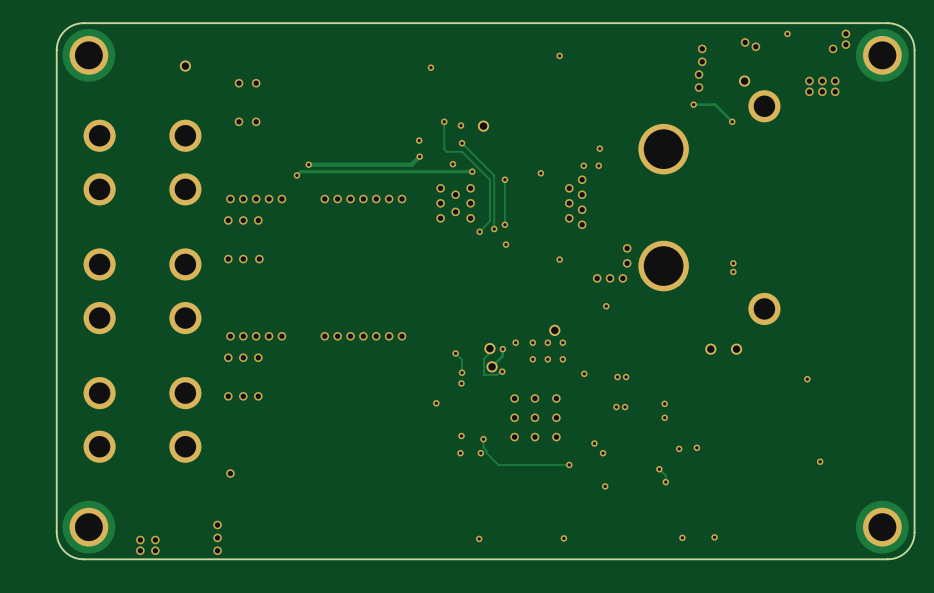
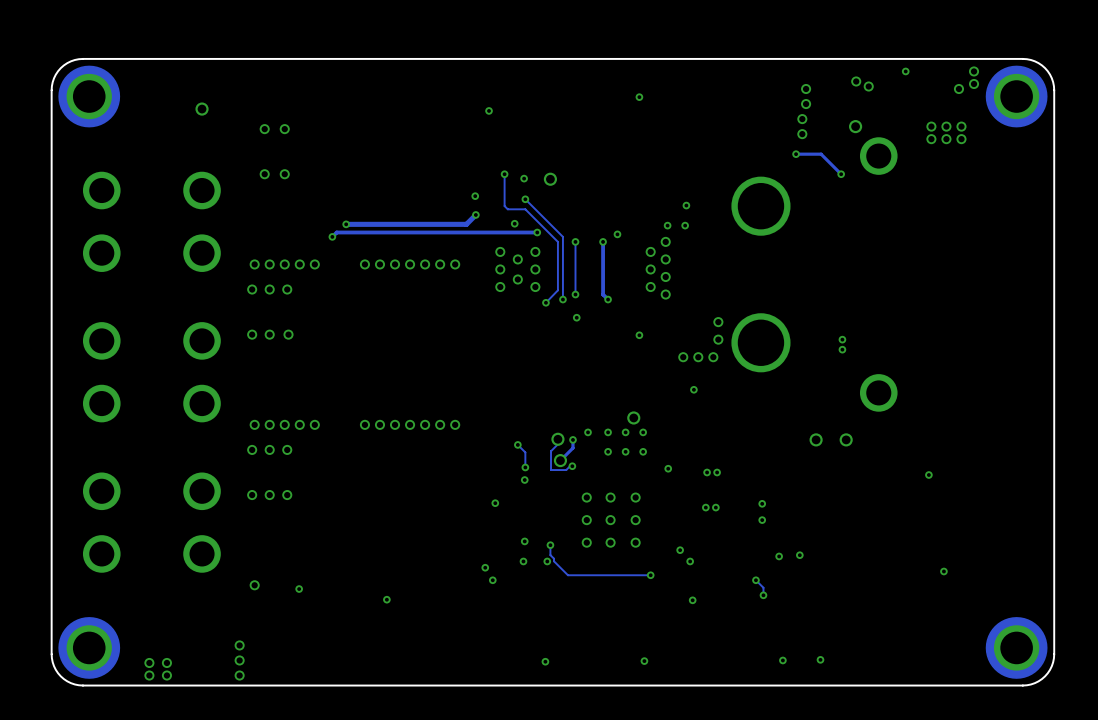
track: none -> (603, 241) (603, 294) (608, 299)
via: none -> (603, 241)
via: none -> (608, 299)
via: none -> (485, 567)
via: none -> (492, 580)
via: none -> (299, 589)
via: none -> (386, 599)

